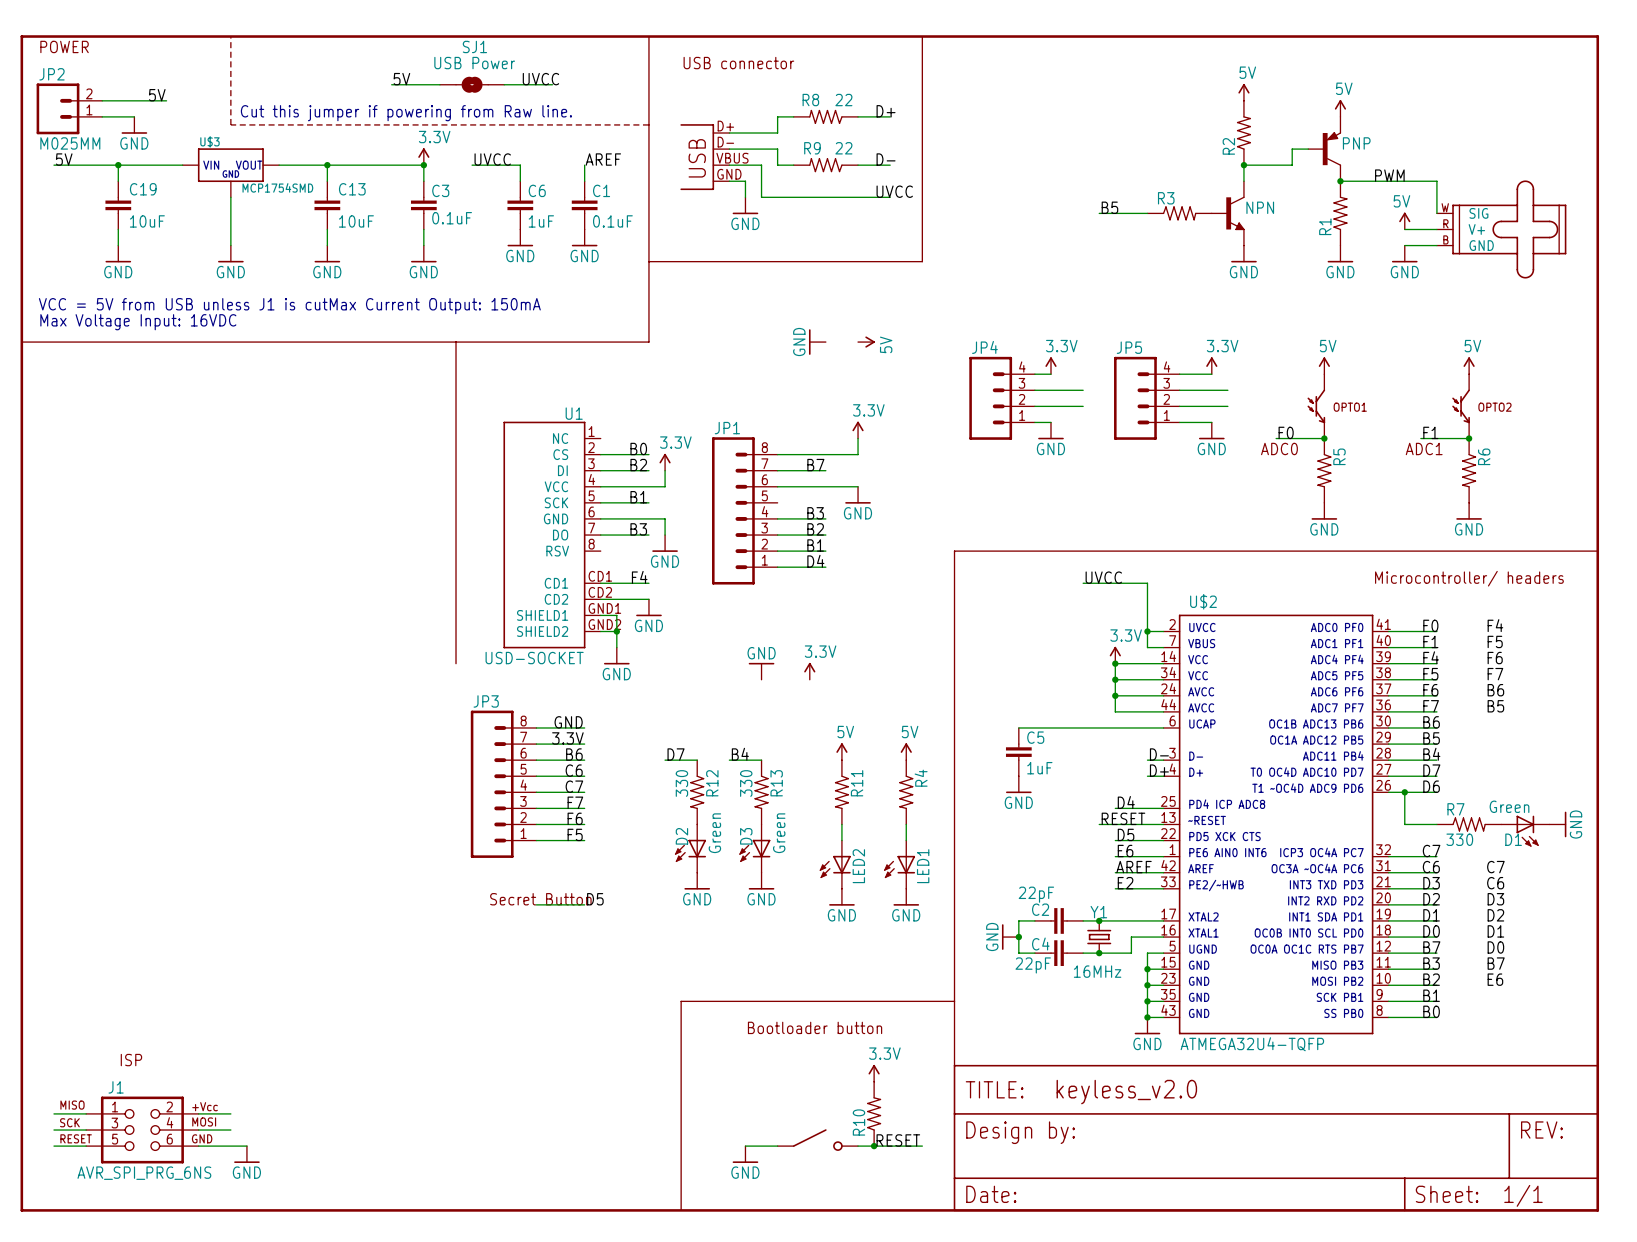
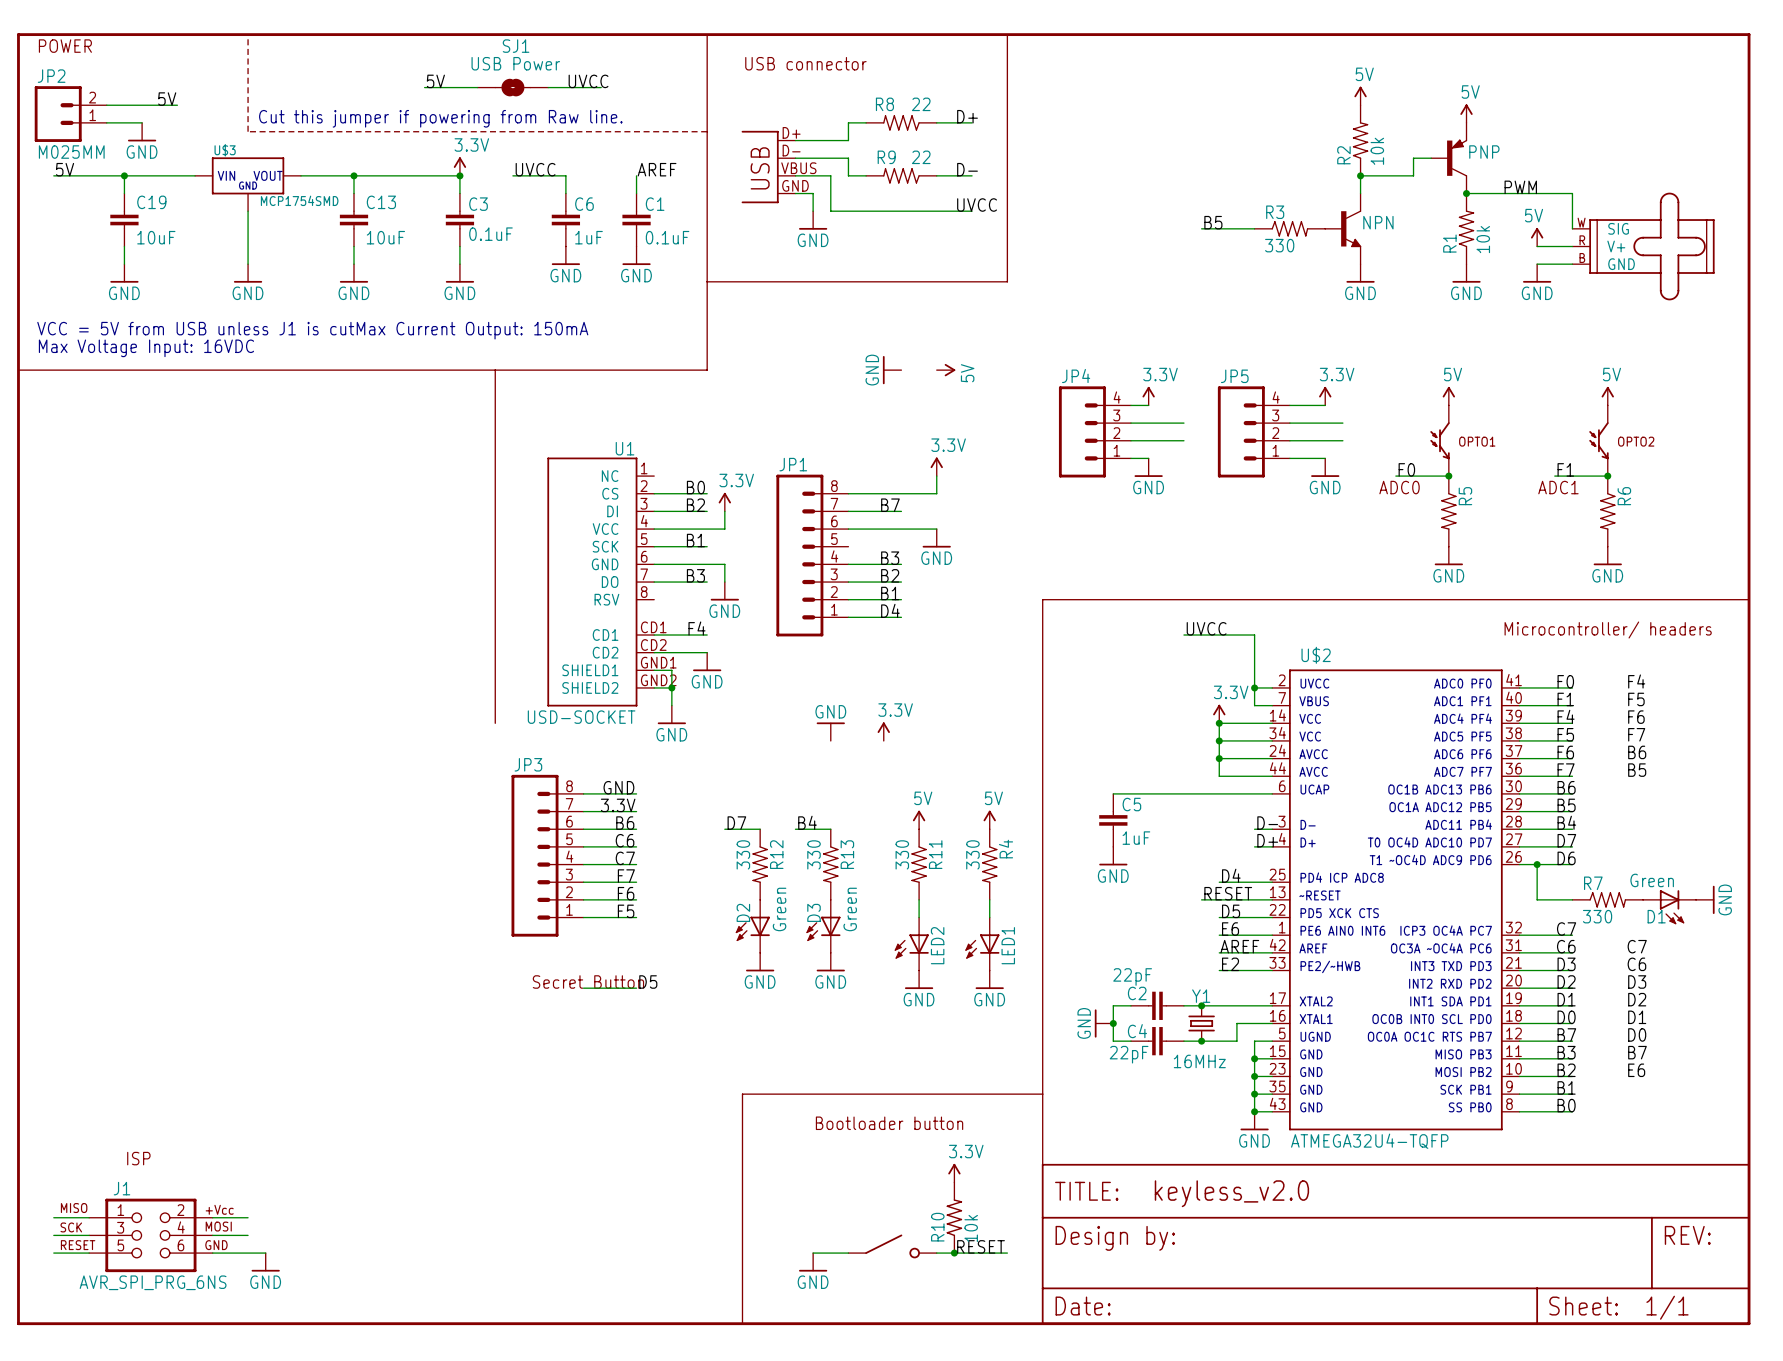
R2 value: none -> 10k (1377, 151)
R1 value: none -> 10k (1483, 239)
R3 value: none -> 330 (1279, 245)
R11 value: none -> 330 (902, 854)
R4 value: none -> 330 (972, 854)
R10 value: none -> 10k (971, 1228)

